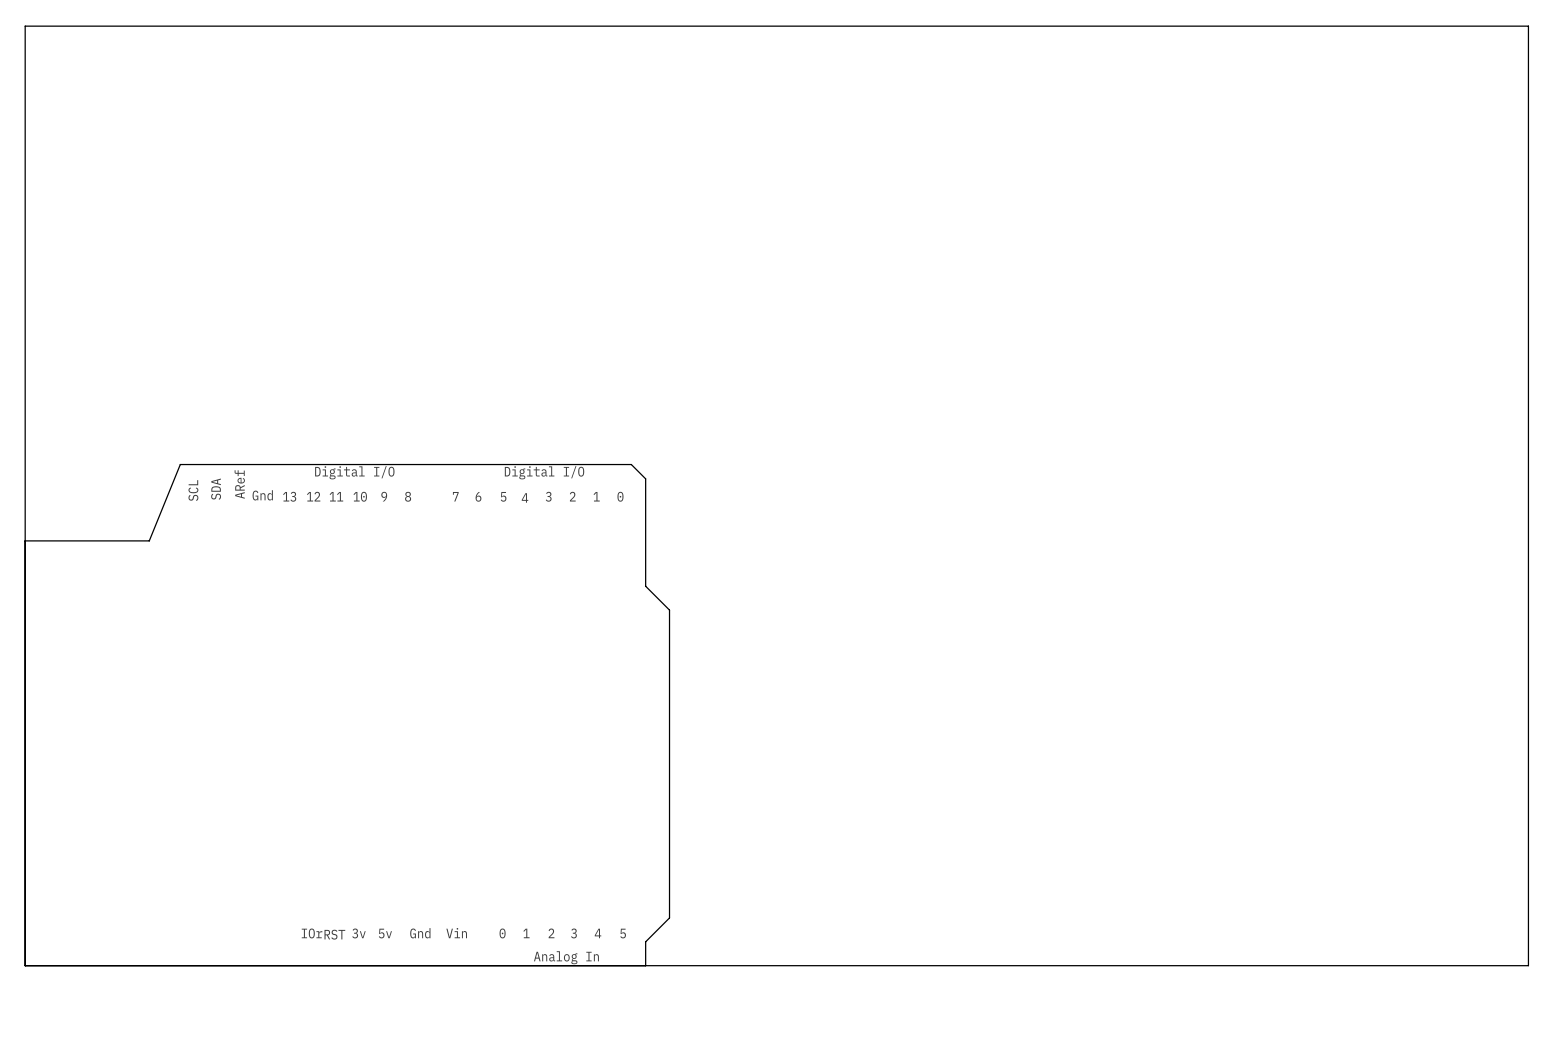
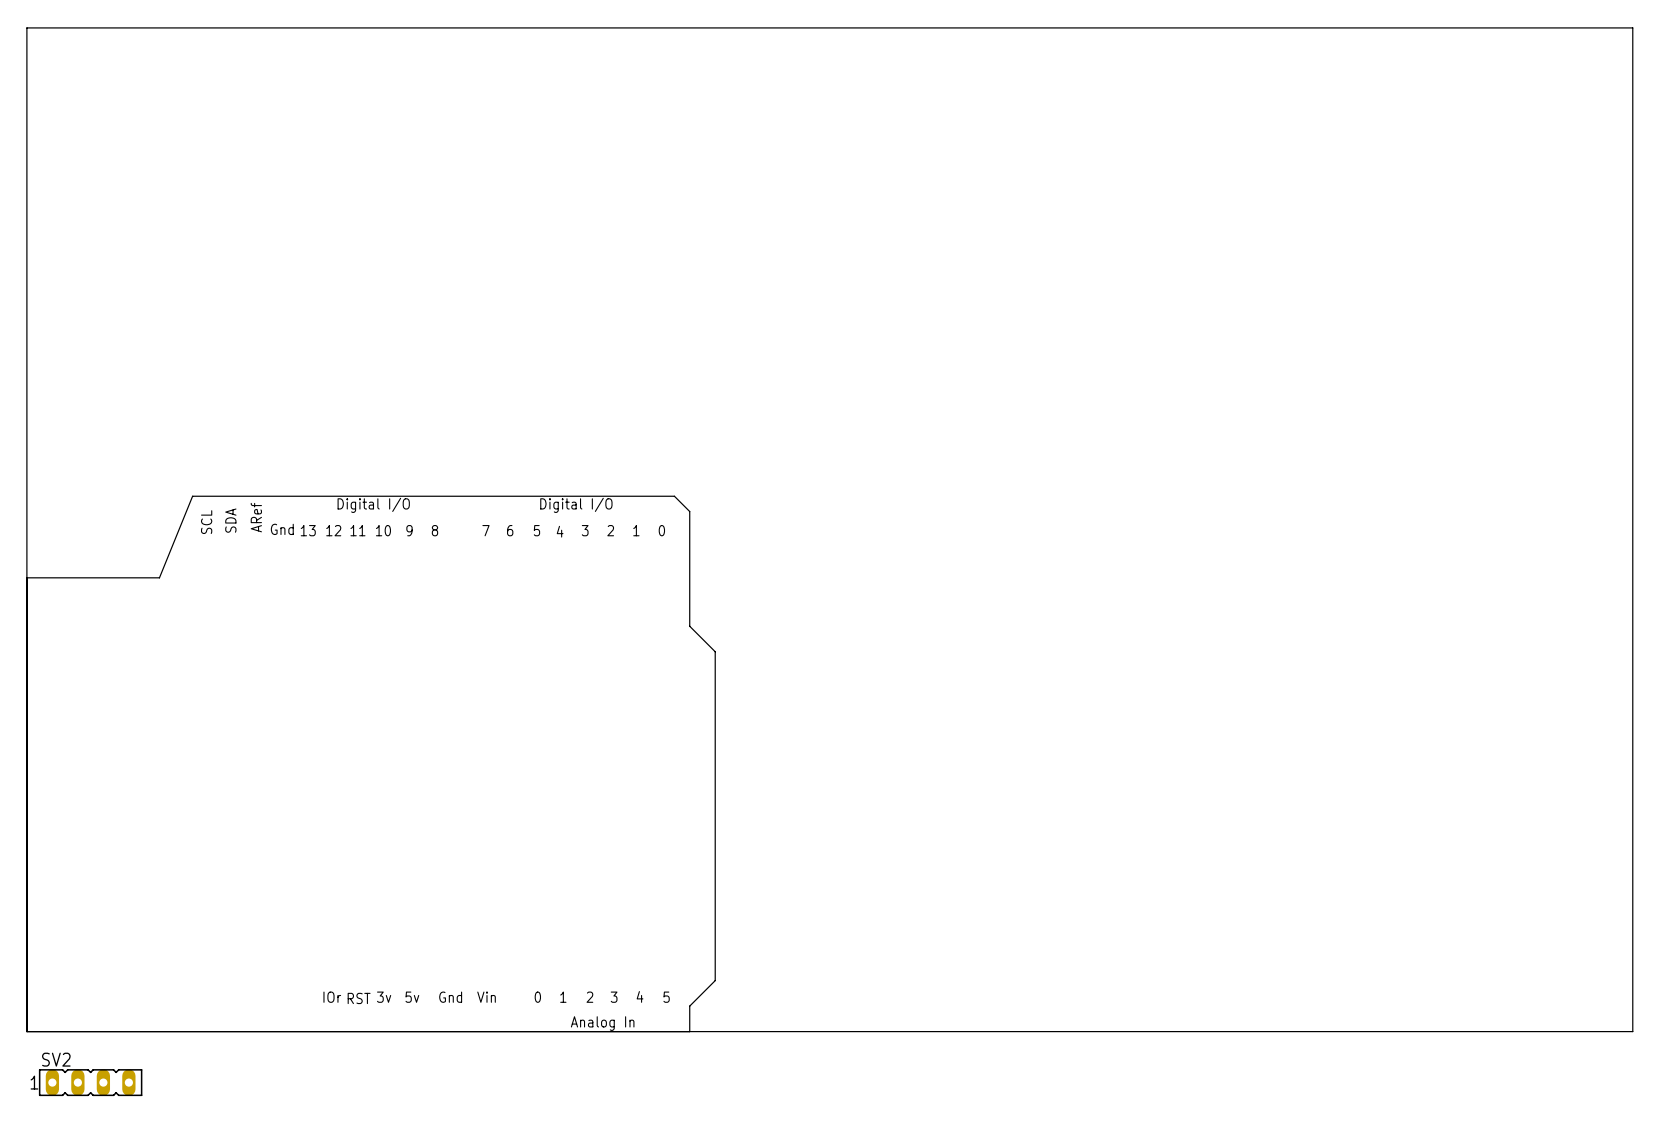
SV2: none -> (90, 1082)

